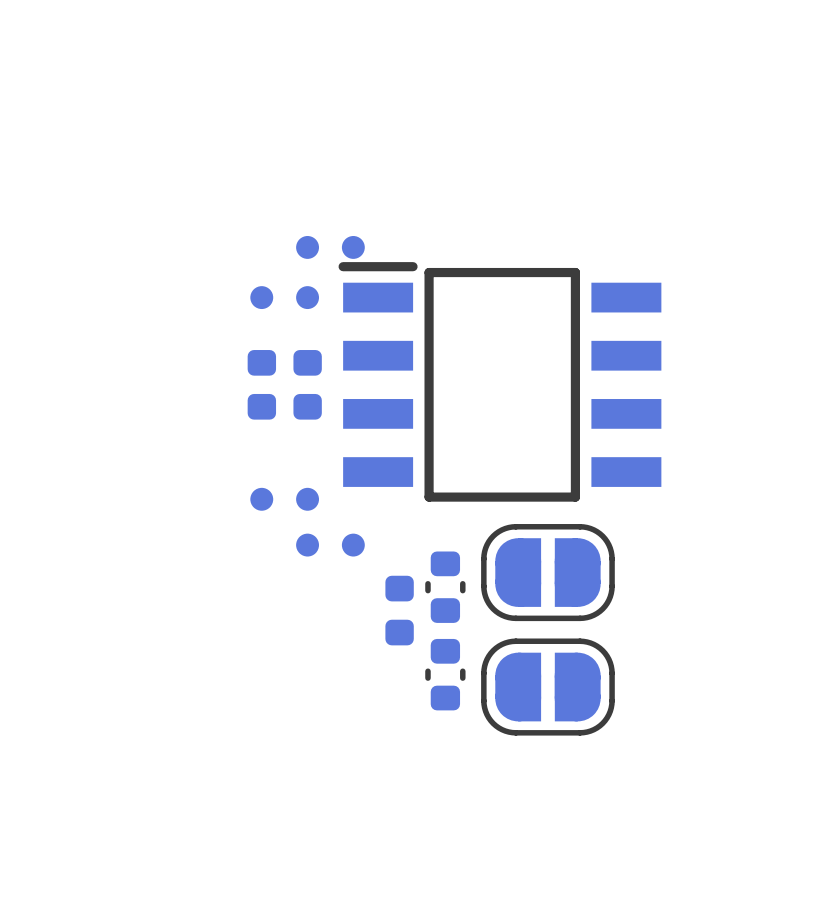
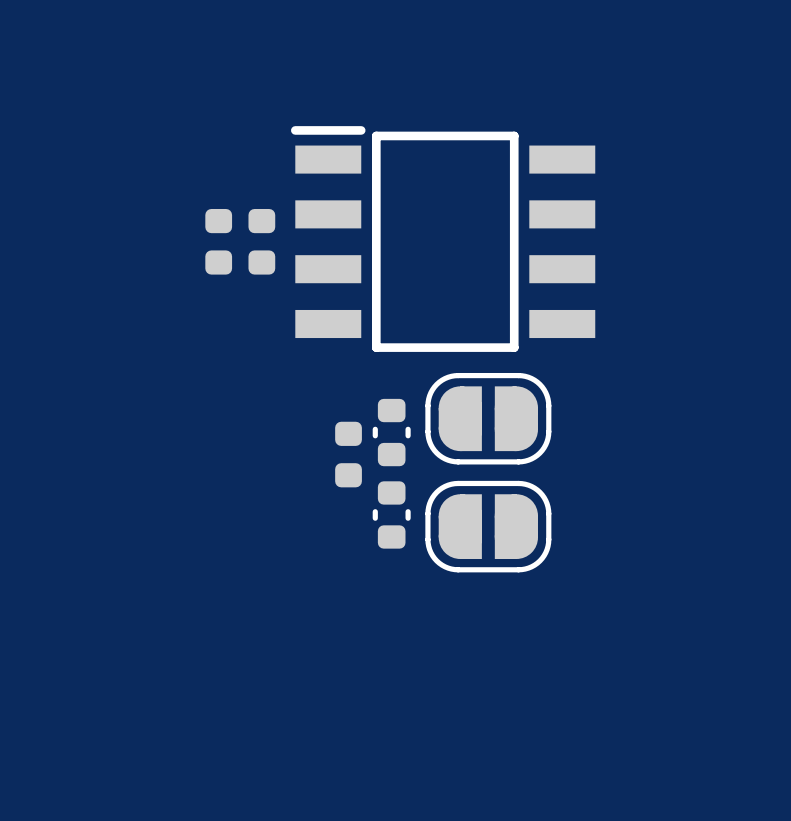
part: (330, 247) -> none
part: (284, 297) -> none
part: (284, 499) -> none
part: (330, 545) -> none

